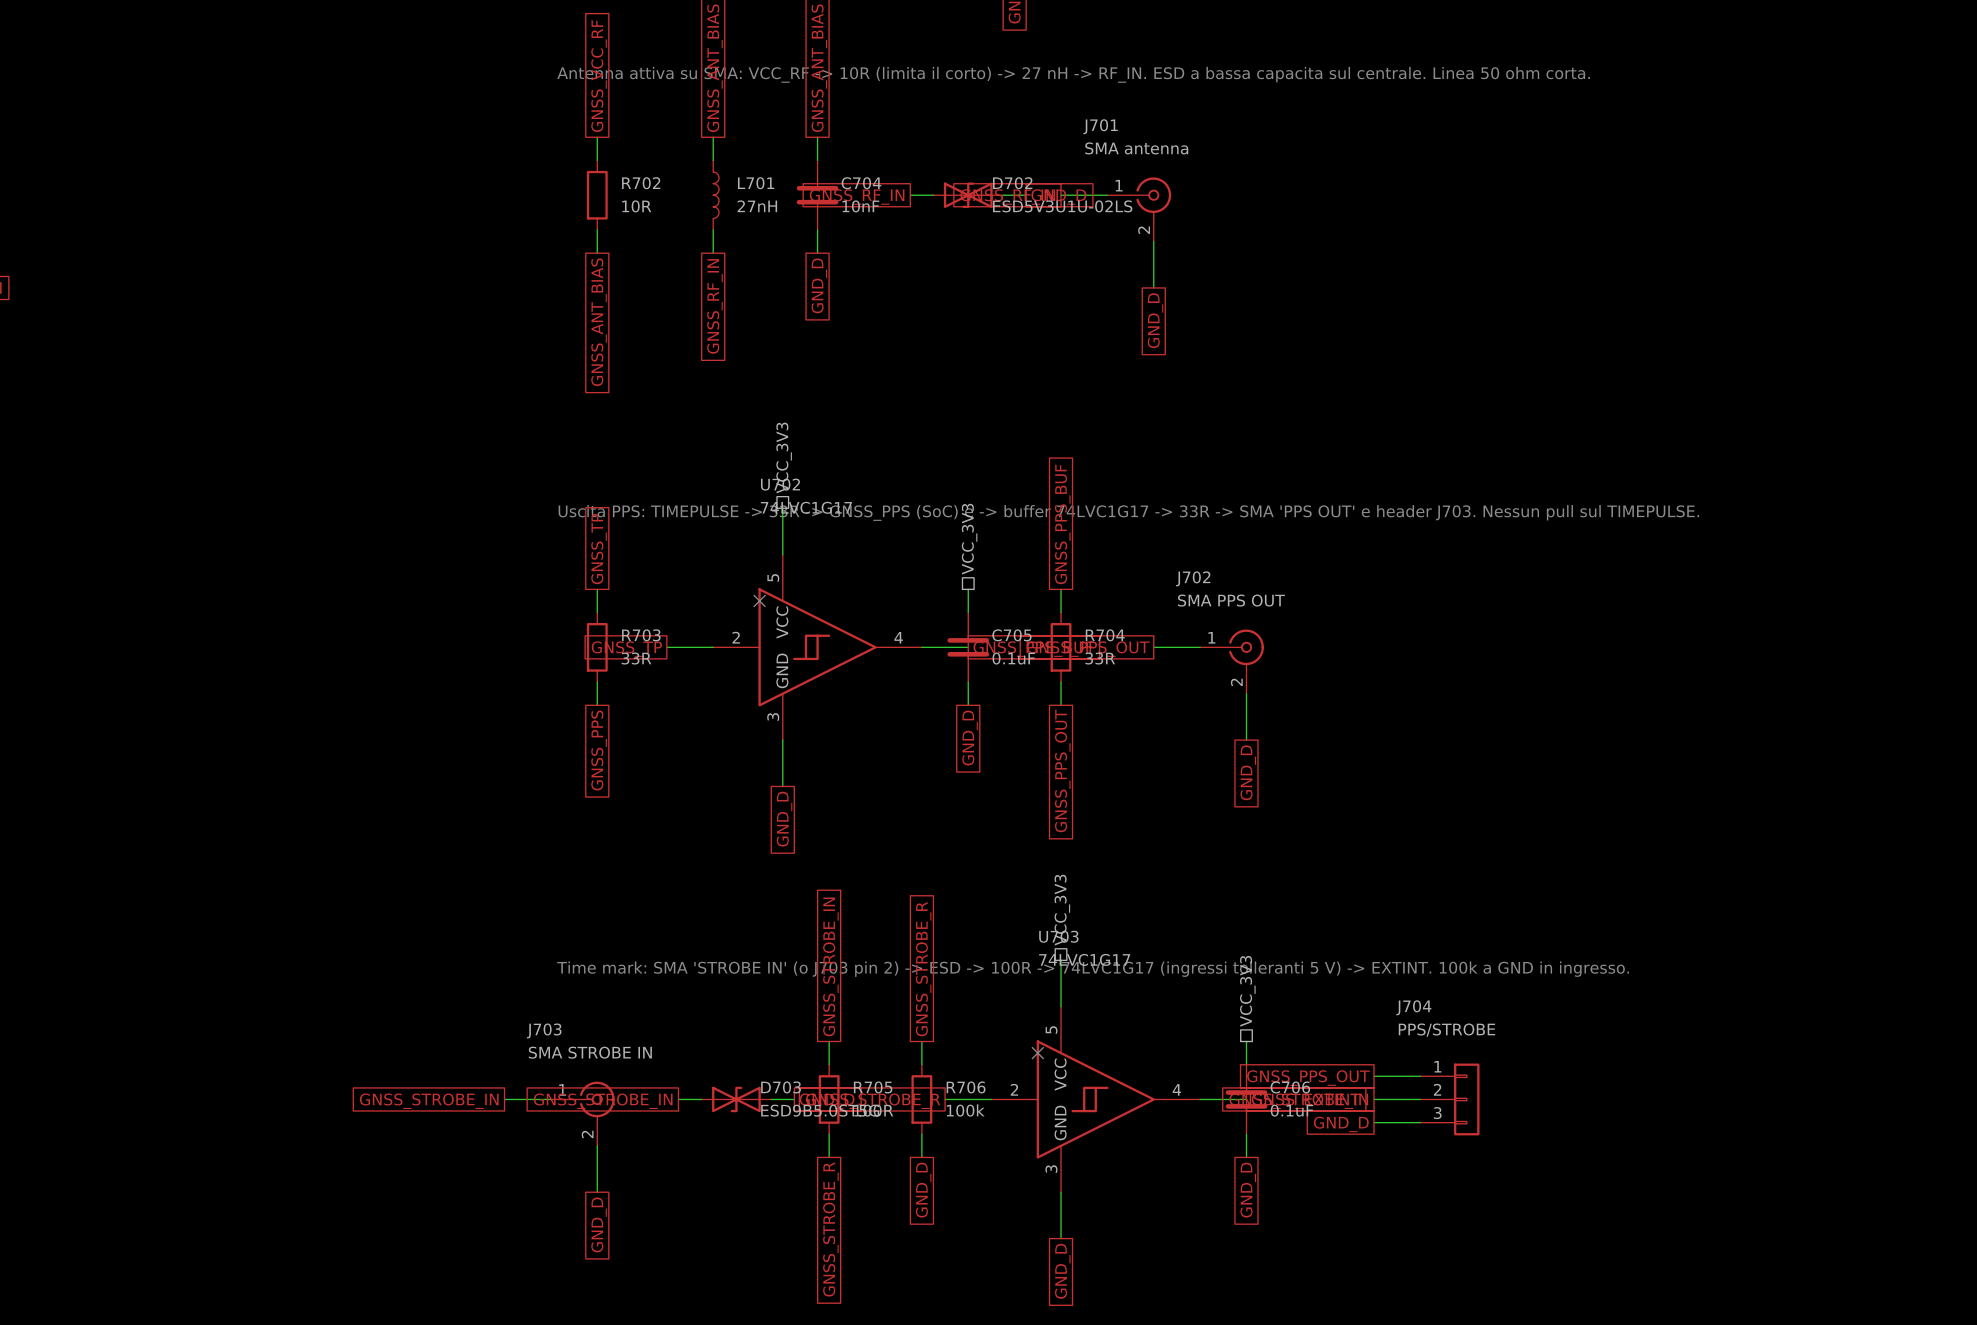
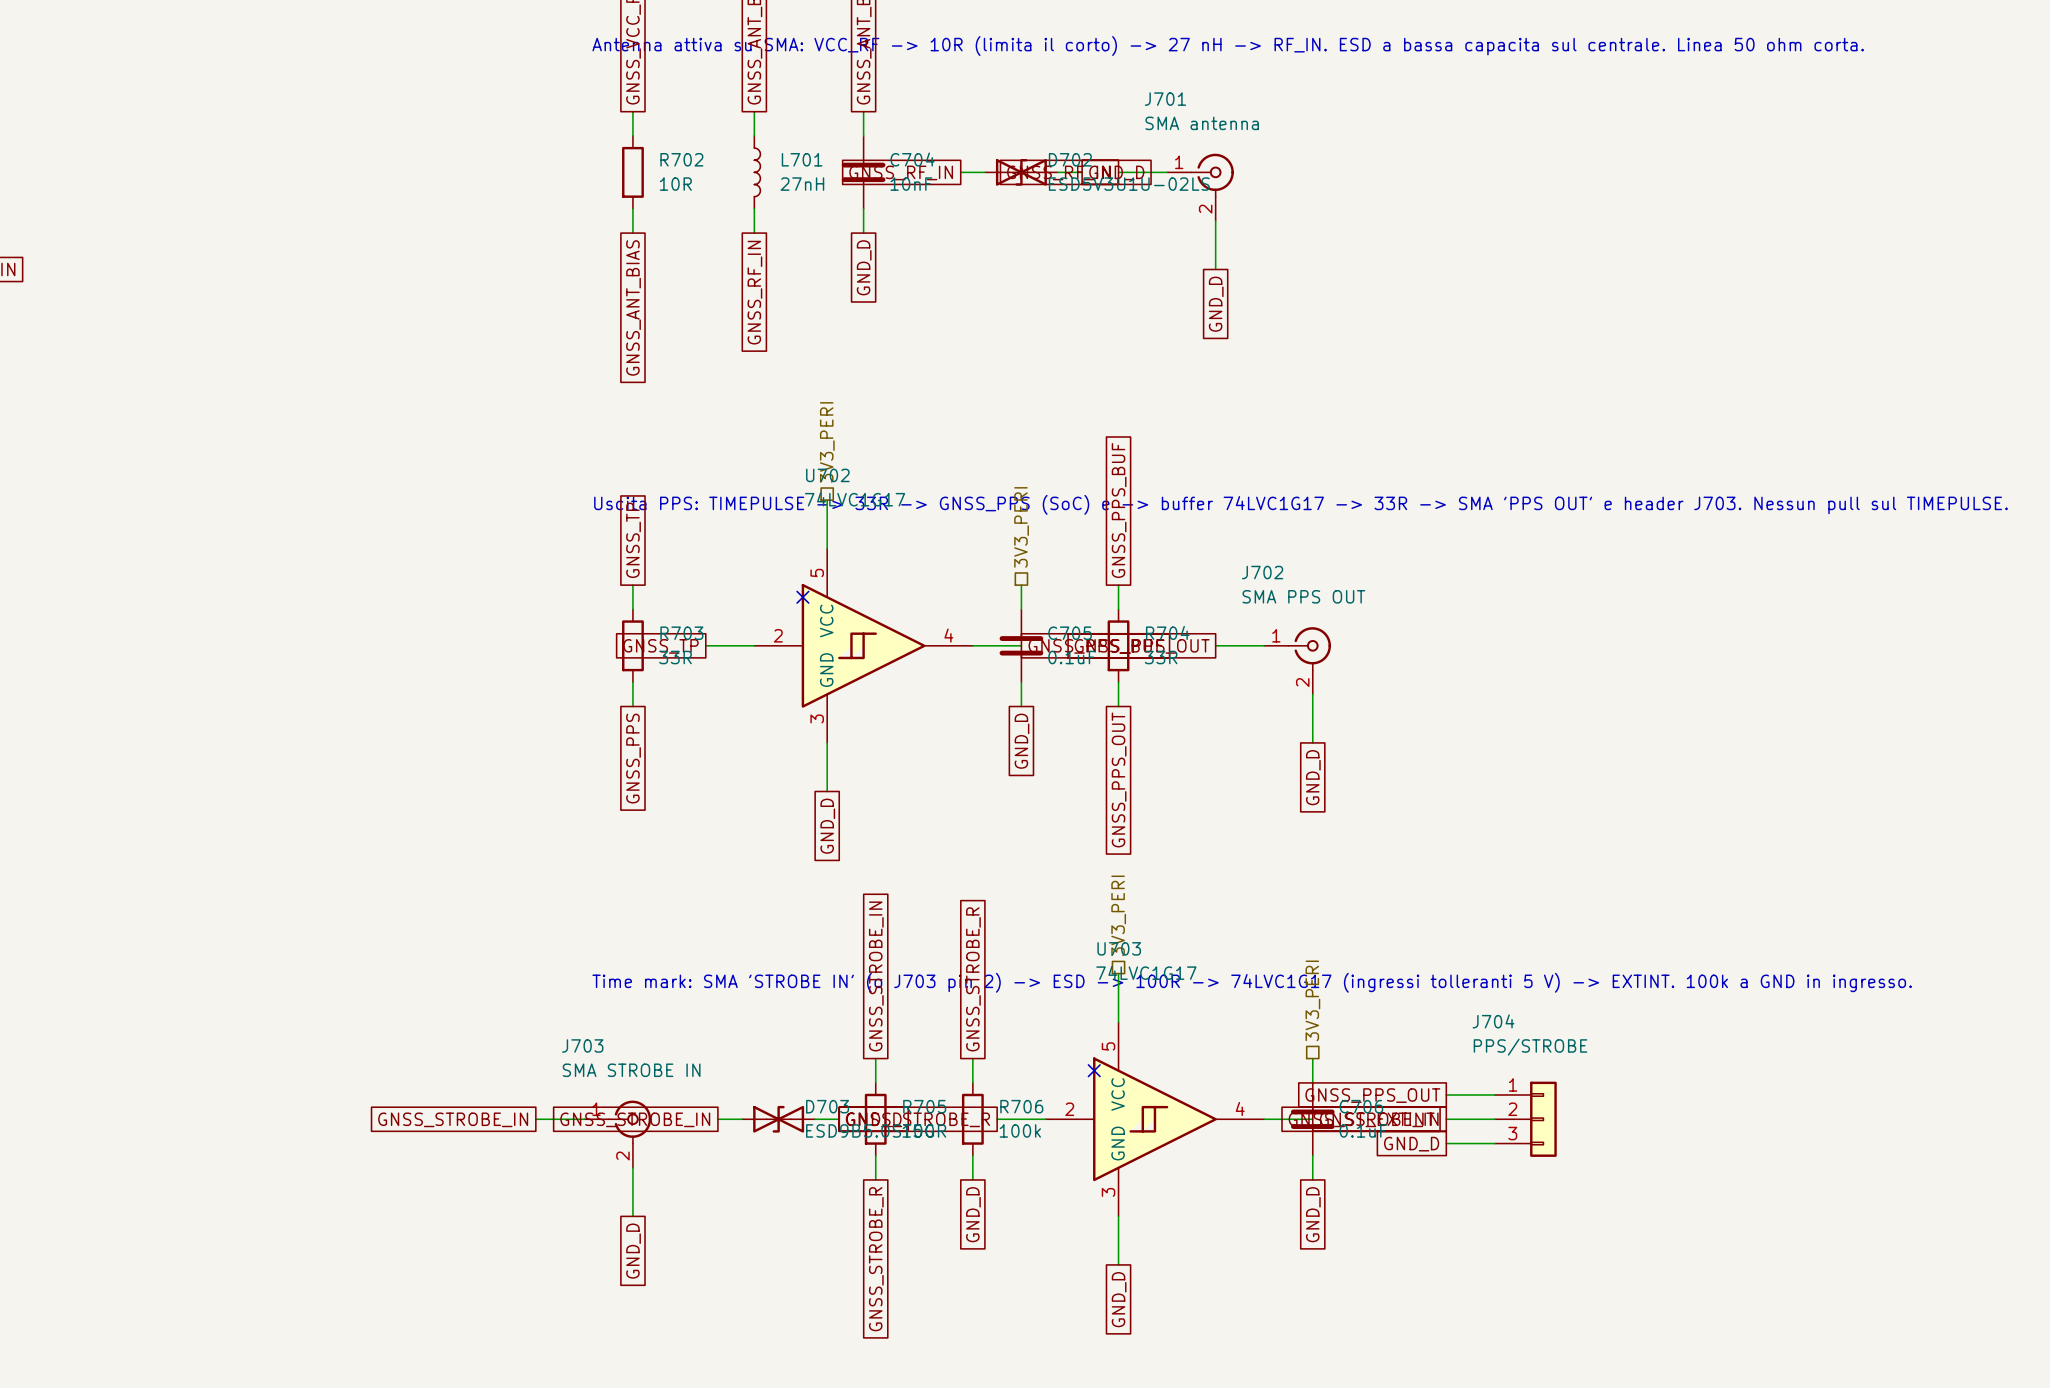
hierarchical label: VCC_3V3 (784, 458) -> 3V3_PERI (827, 442)
hierarchical label: VCC_3V3 (969, 539) -> 3V3_PERI (1021, 527)
hierarchical label: VCC_3V3 (1062, 910) -> 3V3_PERI (1118, 915)
hierarchical label: VCC_3V3 (1247, 991) -> 3V3_PERI (1312, 1000)

